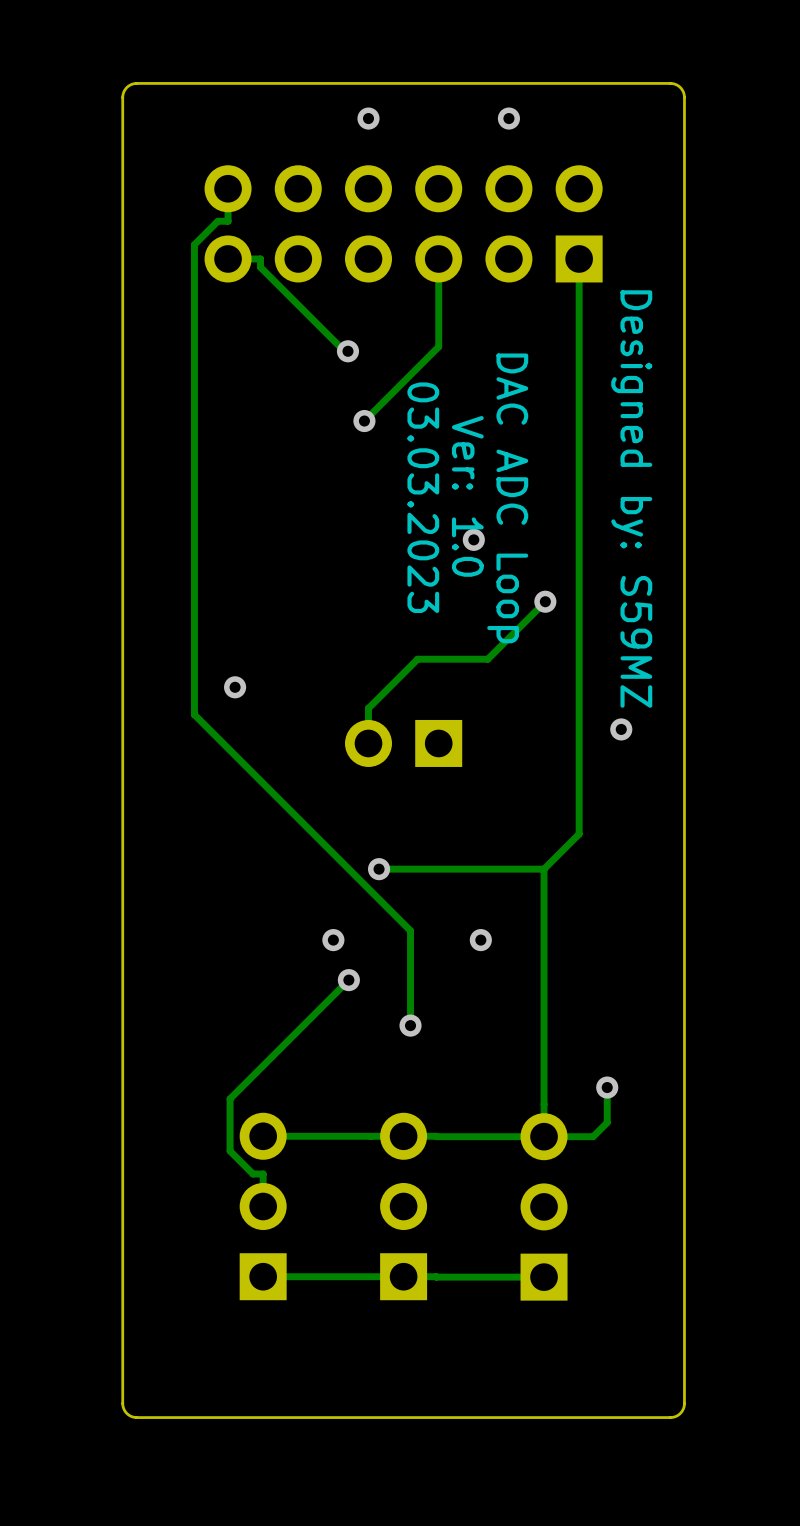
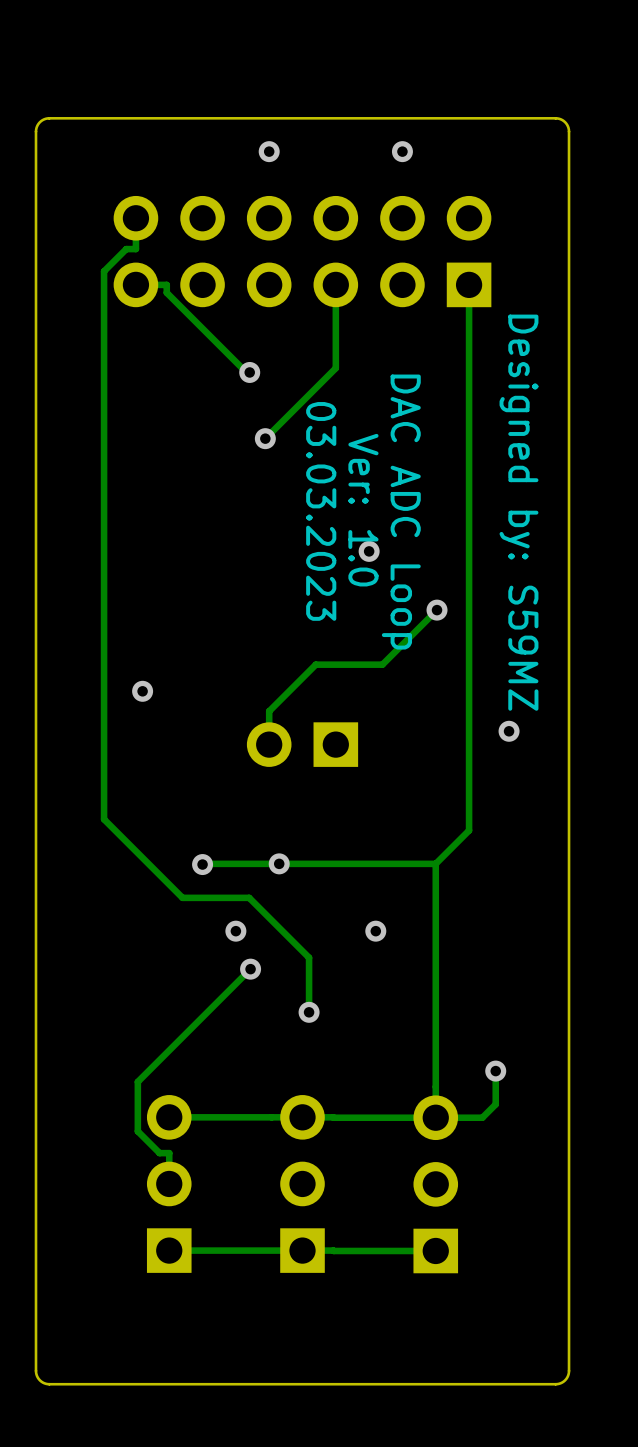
track: (194, 714) (410, 930) (410, 968) -> (104, 717) (104, 819) (182, 897) (249, 897) (309, 957)
via: none -> (202, 864)
track: none -> (279, 863) (202, 864)

